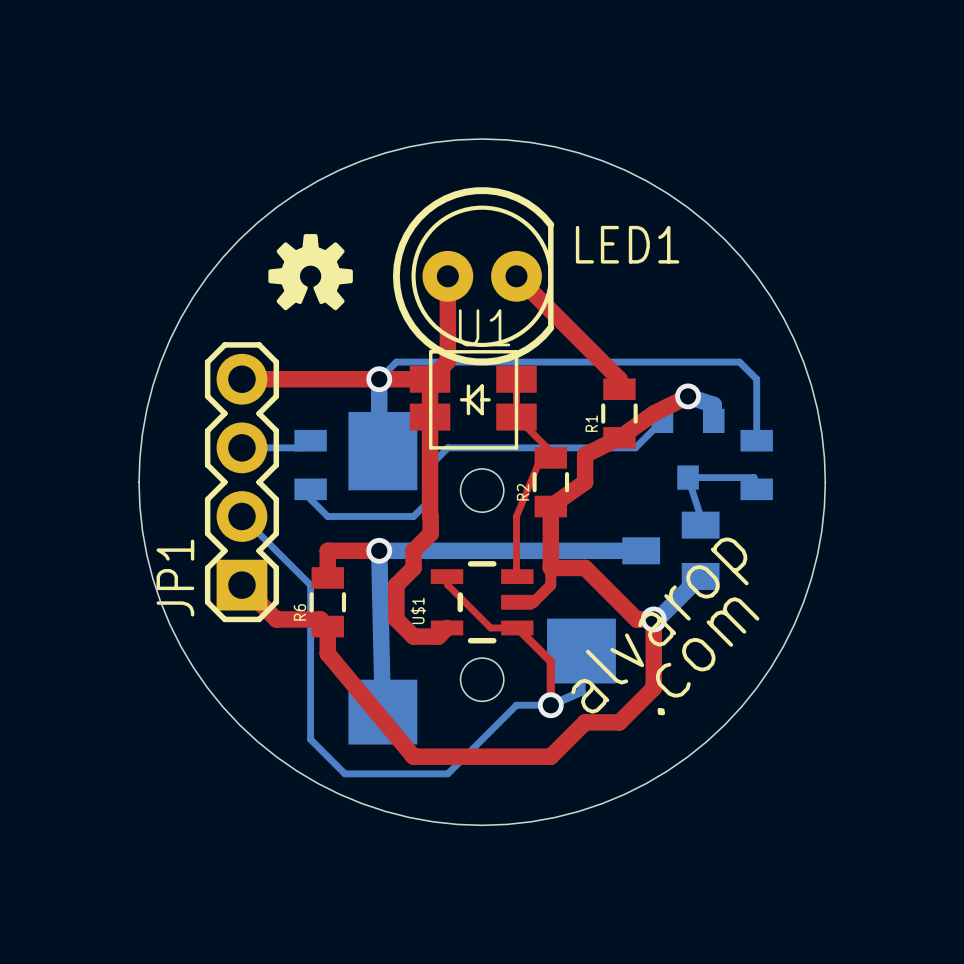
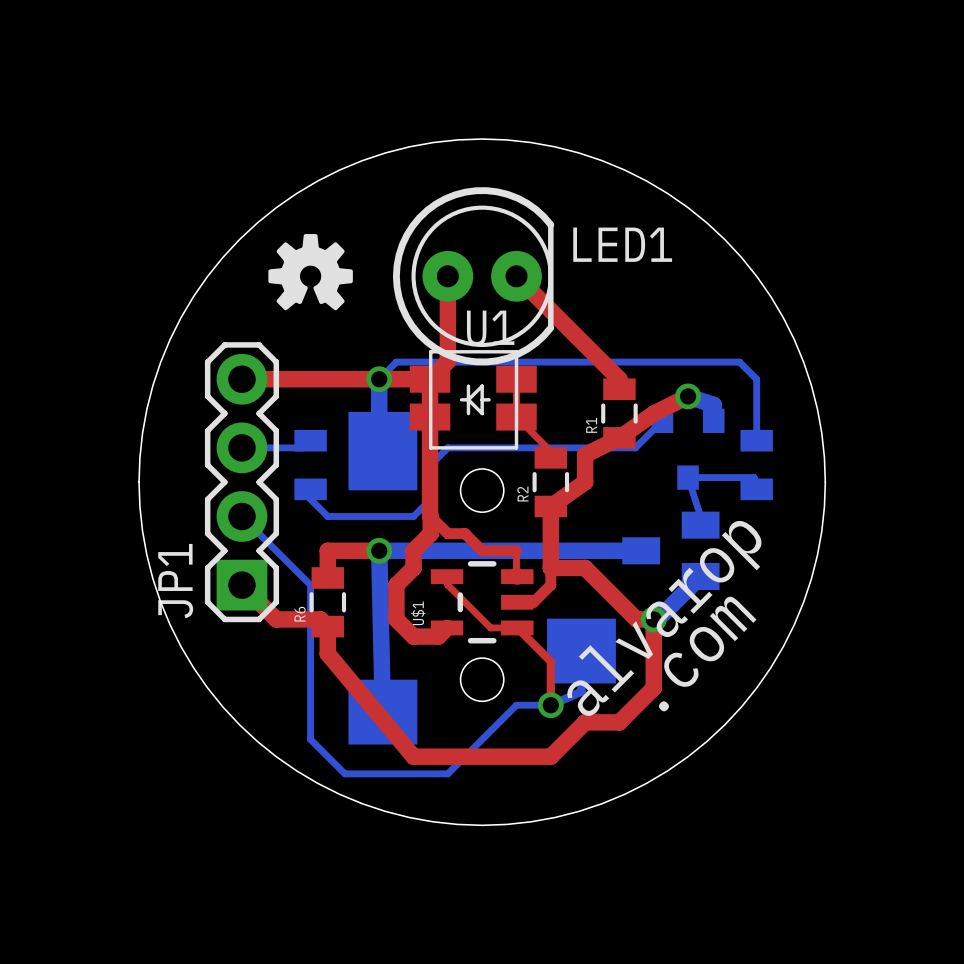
top track: (550, 457) (540, 457) (516, 516) (516, 550) -> (430, 516) (447, 533) (465, 533) (482, 550) (516, 550)

